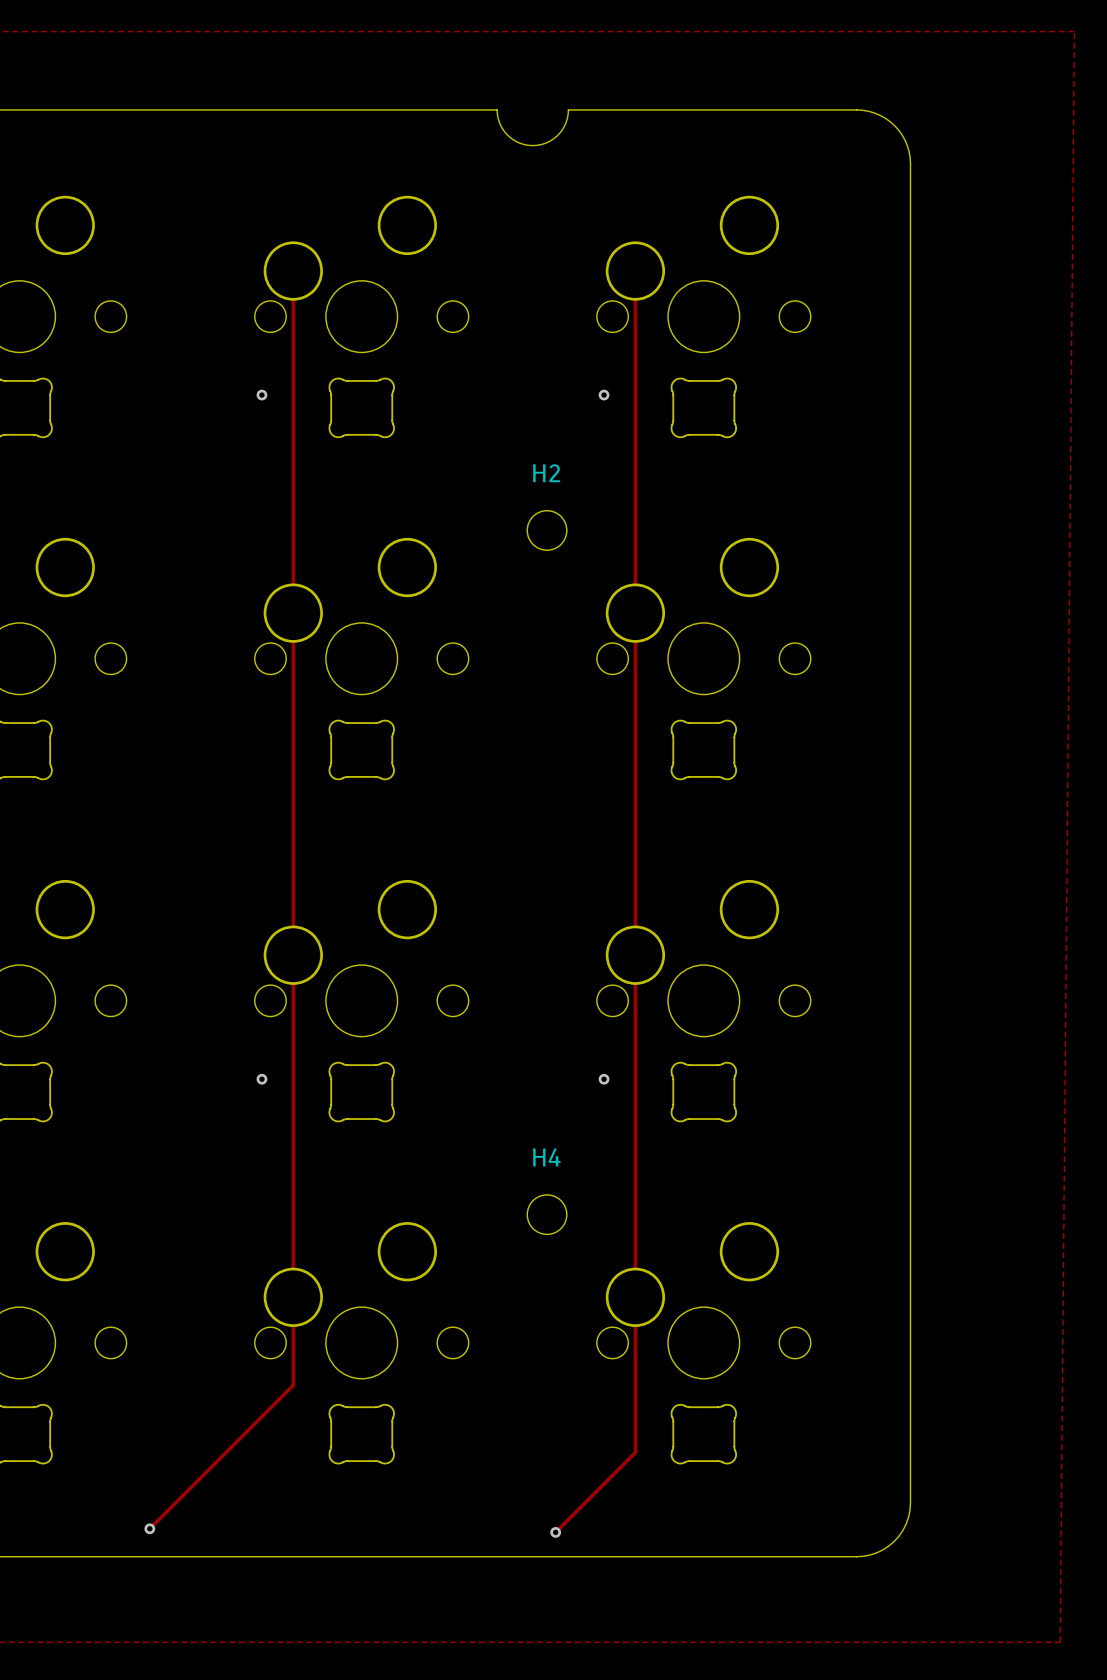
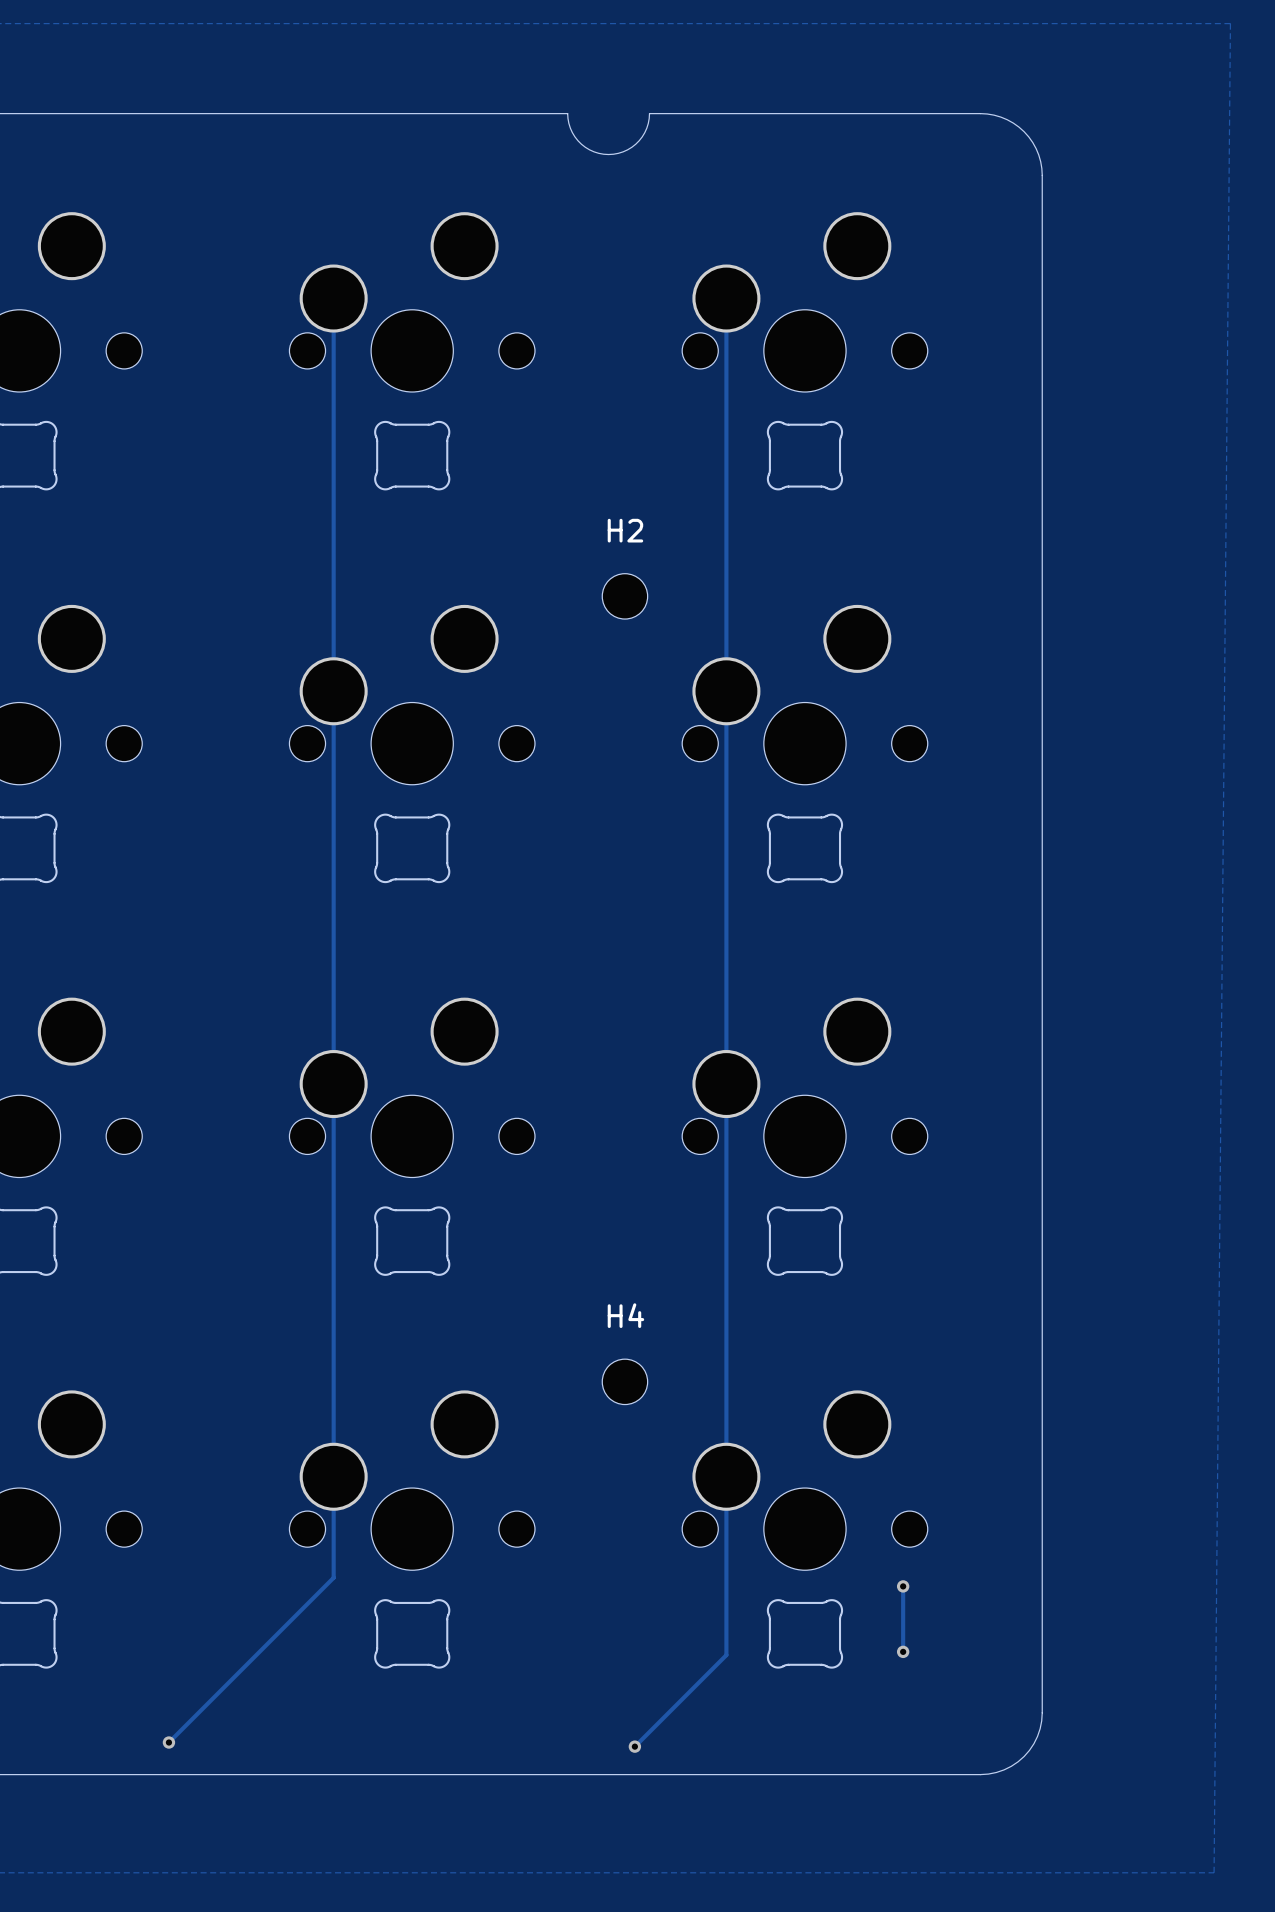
via: (261, 395) -> none
via: (604, 395) -> none
via: (261, 1079) -> none
via: (604, 1079) -> none
track: none -> (903, 1586) (903, 1651)
via: none -> (903, 1586)
via: none -> (903, 1651)

